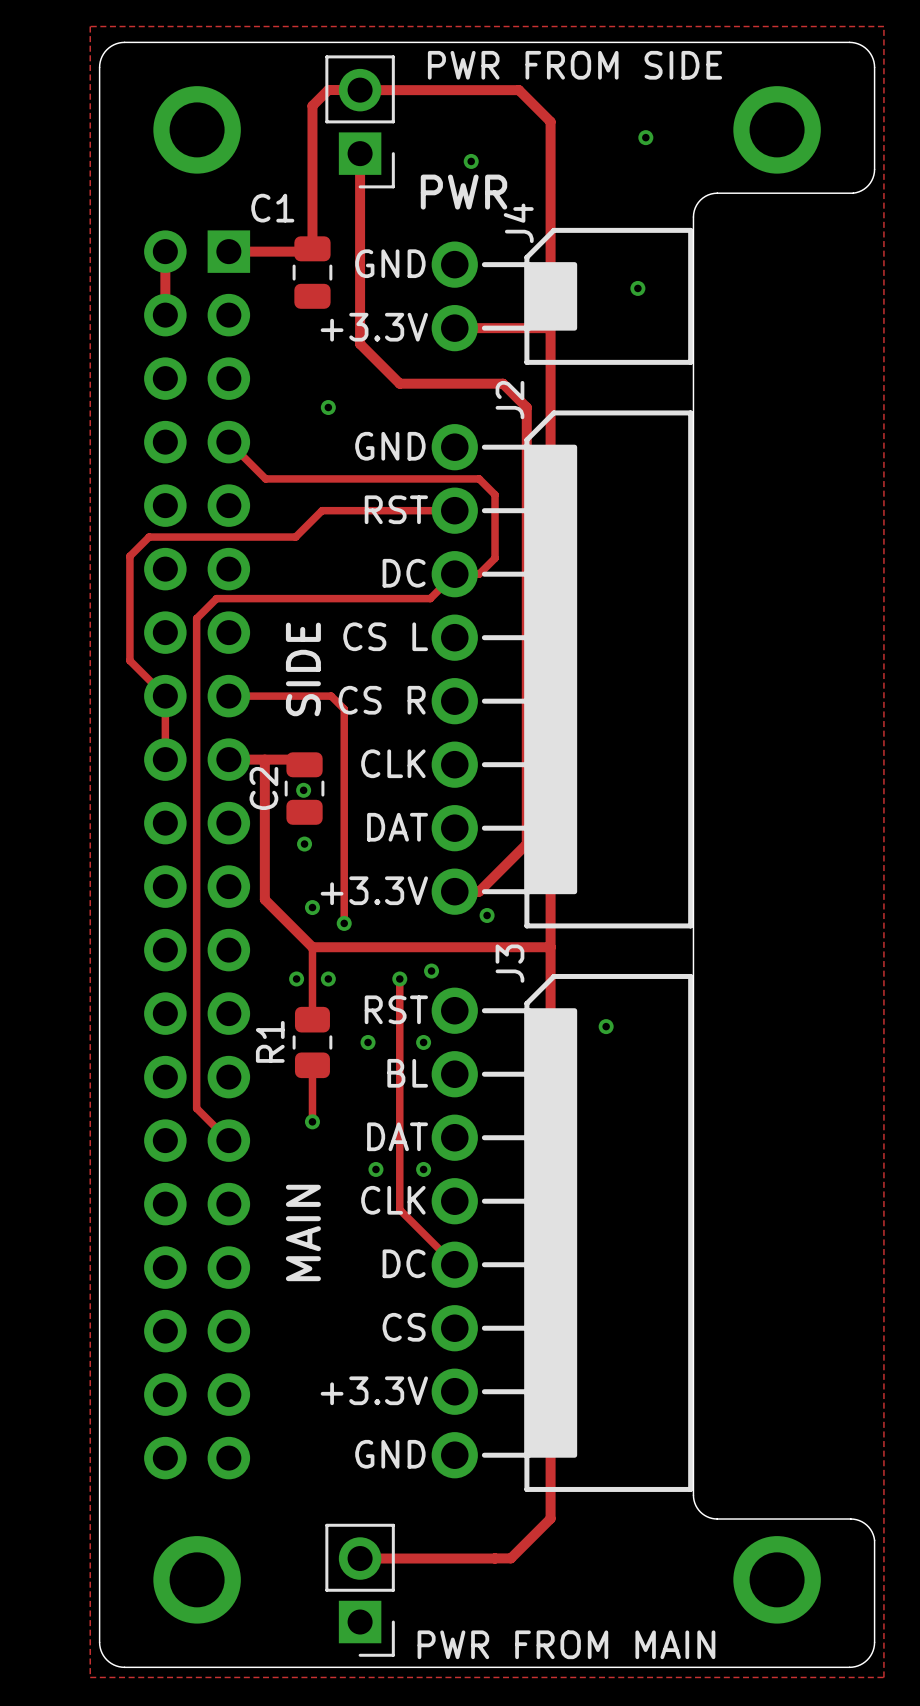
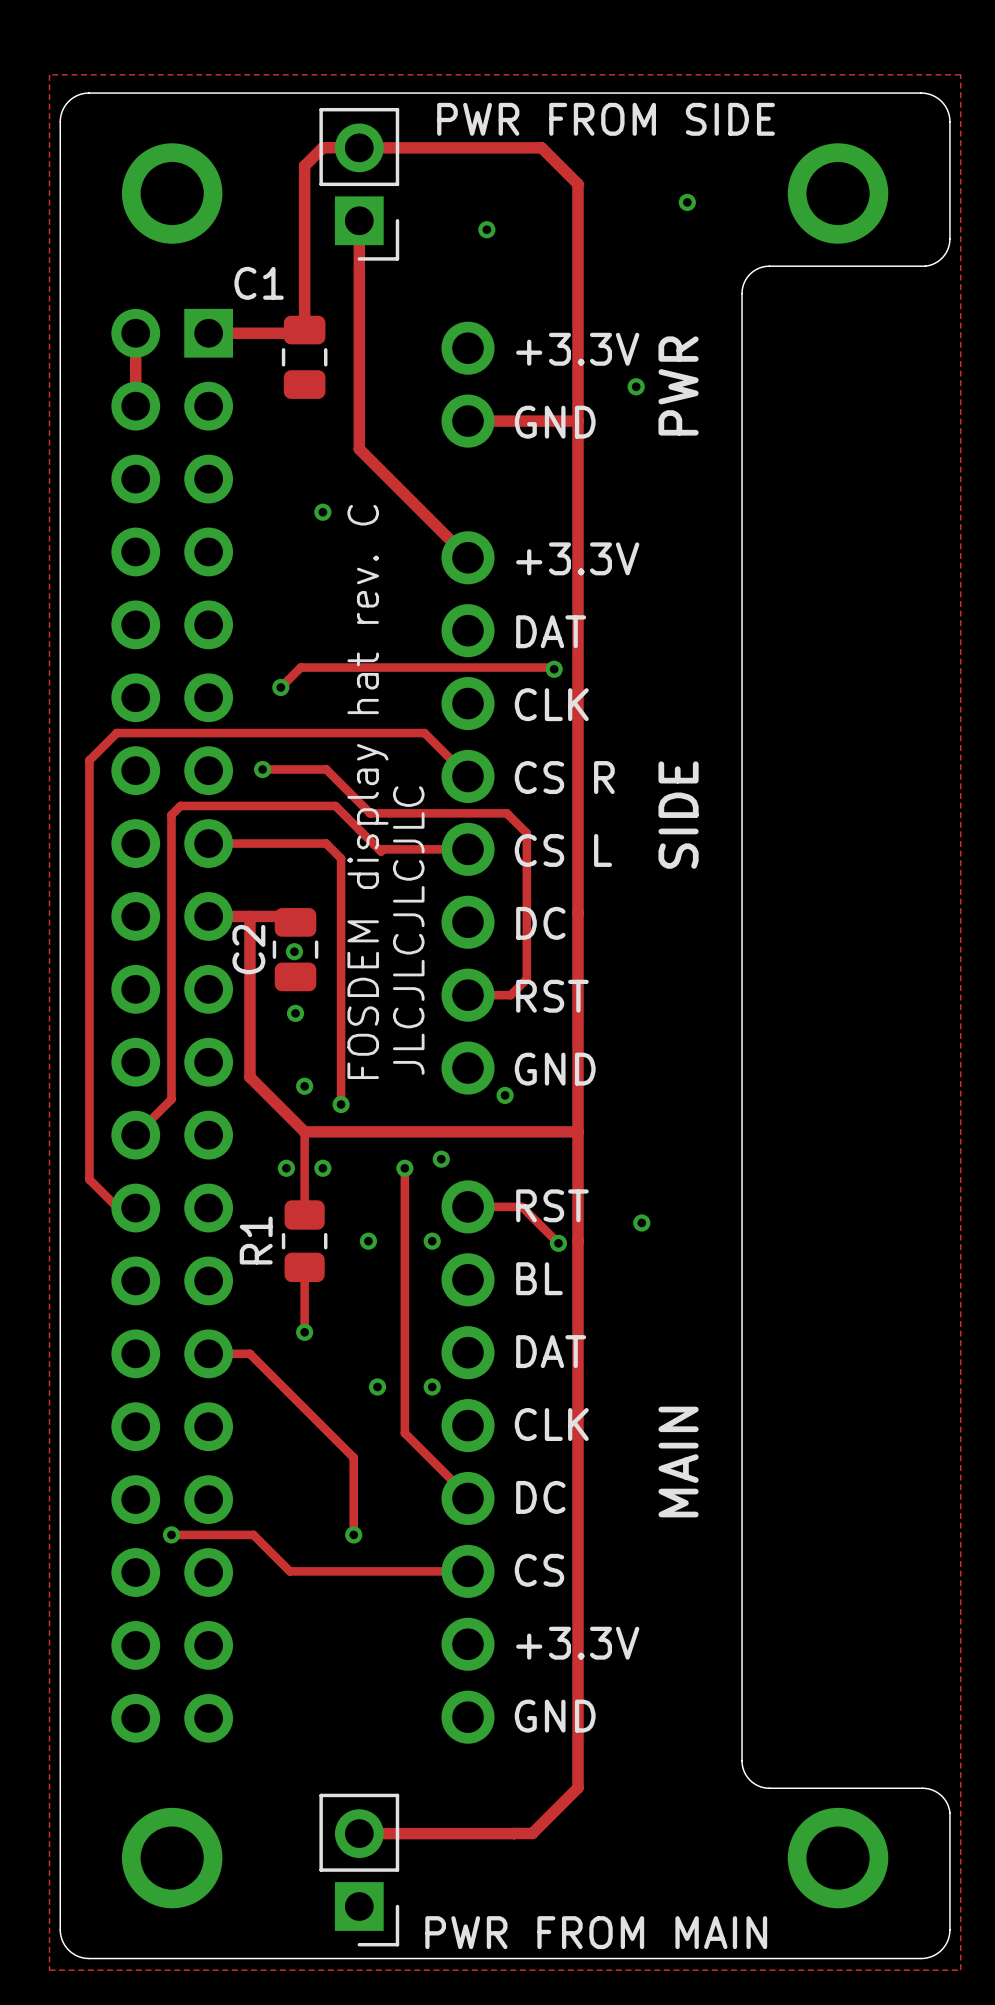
text: none -> +3.3V (577, 349)
via position: (637, 288) -> (636, 386)
J4 side: top (562, 296) -> bottom (468, 384)
text: none -> PWR (678, 385)
text: none -> GND (555, 422)
track: (360, 344) (399, 383) (502, 383) (526, 407) (526, 844) (479, 891) (454, 891) (446, 883) -> (359, 439) (359, 449) (468, 557)
track: (228, 442) (265, 478) (479, 478) (495, 494) (495, 558) (479, 574) (454, 574) (430, 598) (216, 598) (196, 618) (196, 1108) (228, 1140) -> (353, 1534) (353, 1457) (249, 1353) (208, 1353)
text: none -> +3.3V (577, 558)
track: (454, 510) (322, 510) (295, 537) (149, 537) (129, 556) (129, 660) (165, 696) (165, 759) -> none
text: none -> DAT (551, 631)
track: none -> (554, 669) (552, 667) (300, 667) (280, 687)
via: none -> (554, 669)
via: none -> (280, 687)
text: none -> CLK (551, 704)
track: none -> (262, 769) (326, 769) (370, 813) (506, 813) (526, 833) (526, 979) (510, 995) (468, 995)
via: none -> (262, 769)
track: none -> (468, 776) (424, 733) (116, 733) (89, 760) (89, 1179) (117, 1208) (135, 1208)
text: none -> CS R (564, 777)
text: none -> FOSDEM display hat rev. C (367, 791)
J2 side: top (562, 669) -> bottom (468, 812)
text: none -> SIDE (678, 815)
track: none -> (468, 849) (383, 849) (381, 851) (335, 805) (180, 805) (171, 815) (171, 1099) (135, 1135)
text: none -> CS L (563, 850)
text: none -> DC (540, 923)
text: none -> JLCJLCJLCJLC (408, 930)
text: none -> RST (552, 996)
text: none -> GND (555, 1069)
text: none -> RST (552, 1205)
track: none -> (468, 1206) (522, 1206) (558, 1243)
via: none -> (558, 1243)
text: none -> BL (539, 1278)
text: none -> DAT (551, 1351)
text: none -> CLK (551, 1424)
J3 side: top (562, 1232) -> bottom (468, 1462)
text: none -> MAIN (678, 1462)
text: none -> DC (540, 1497)
track: none -> (171, 1534) (253, 1534) (289, 1571) (468, 1571)
via: none -> (171, 1534)
via: none -> (353, 1534)
text: none -> CS (539, 1570)
text: none -> +3.3V (577, 1643)
text: none -> GND (555, 1716)

